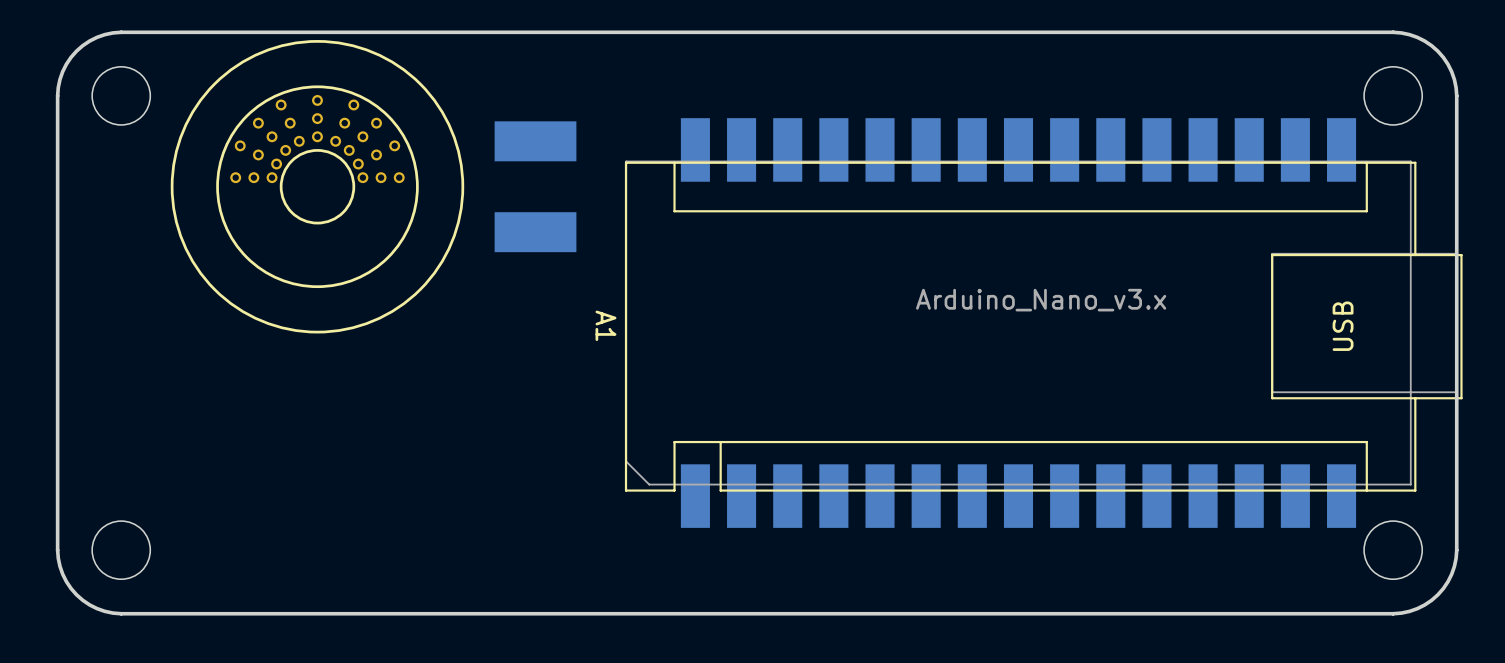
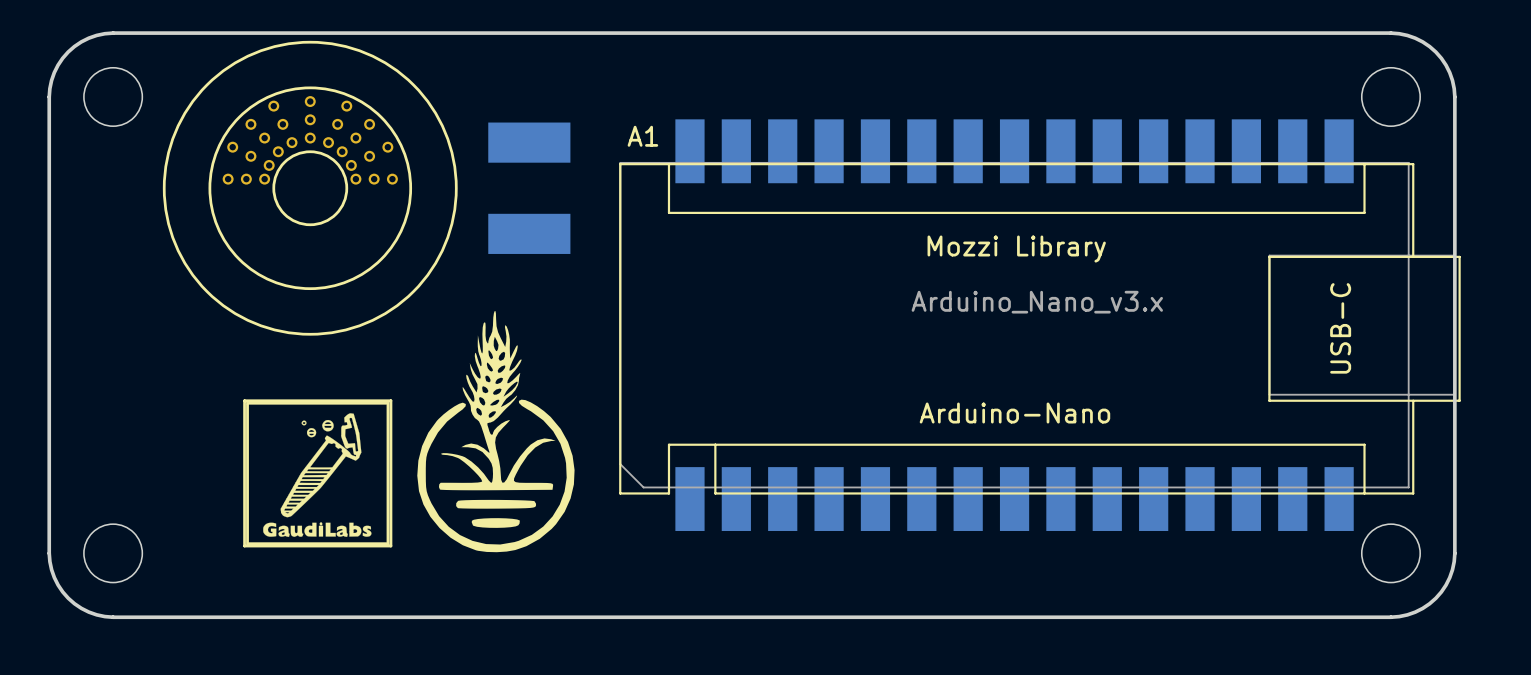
text: none -> Mozzi Library (1016, 249)
drawing: none -> [417, 310, 575, 553]
A1 name rotation: 0° (605, 325) -> 90° counterclockwise (642, 136)
A1 name position: A1 (605, 325) -> A1 (642, 136)
A1 text: USB (1343, 326) -> USB-C (1340, 328)
line: none -> (390, 400) (244, 400) (244, 546) (390, 546) (390, 400)
drawing: none -> [246, 401, 390, 546]
text: none -> Arduino-Nano (1014, 413)

